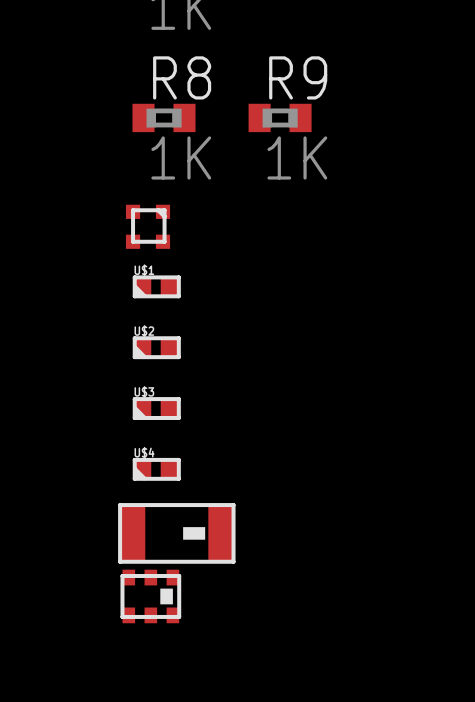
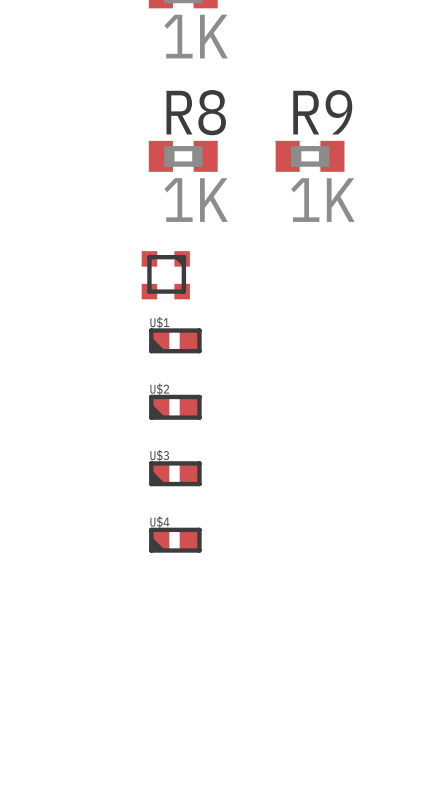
part: (176, 533) -> none
part: (150, 596) -> none

